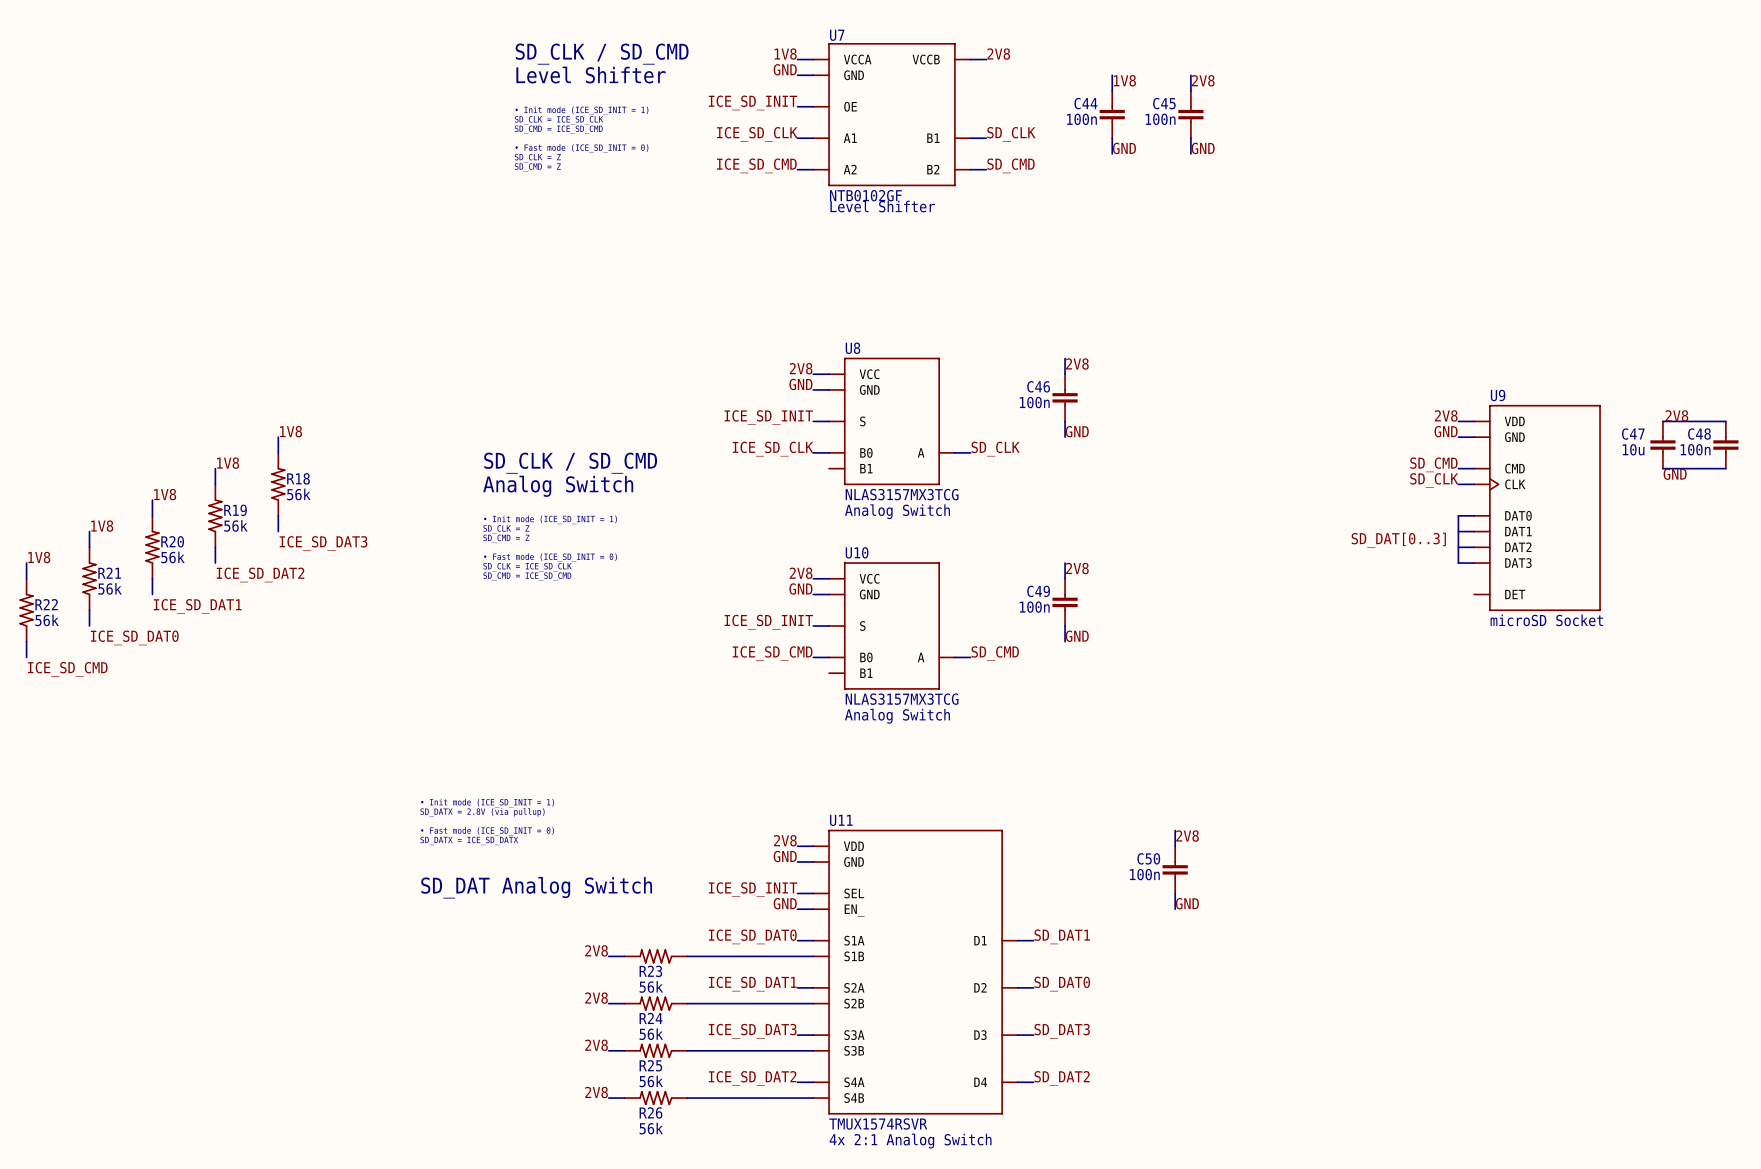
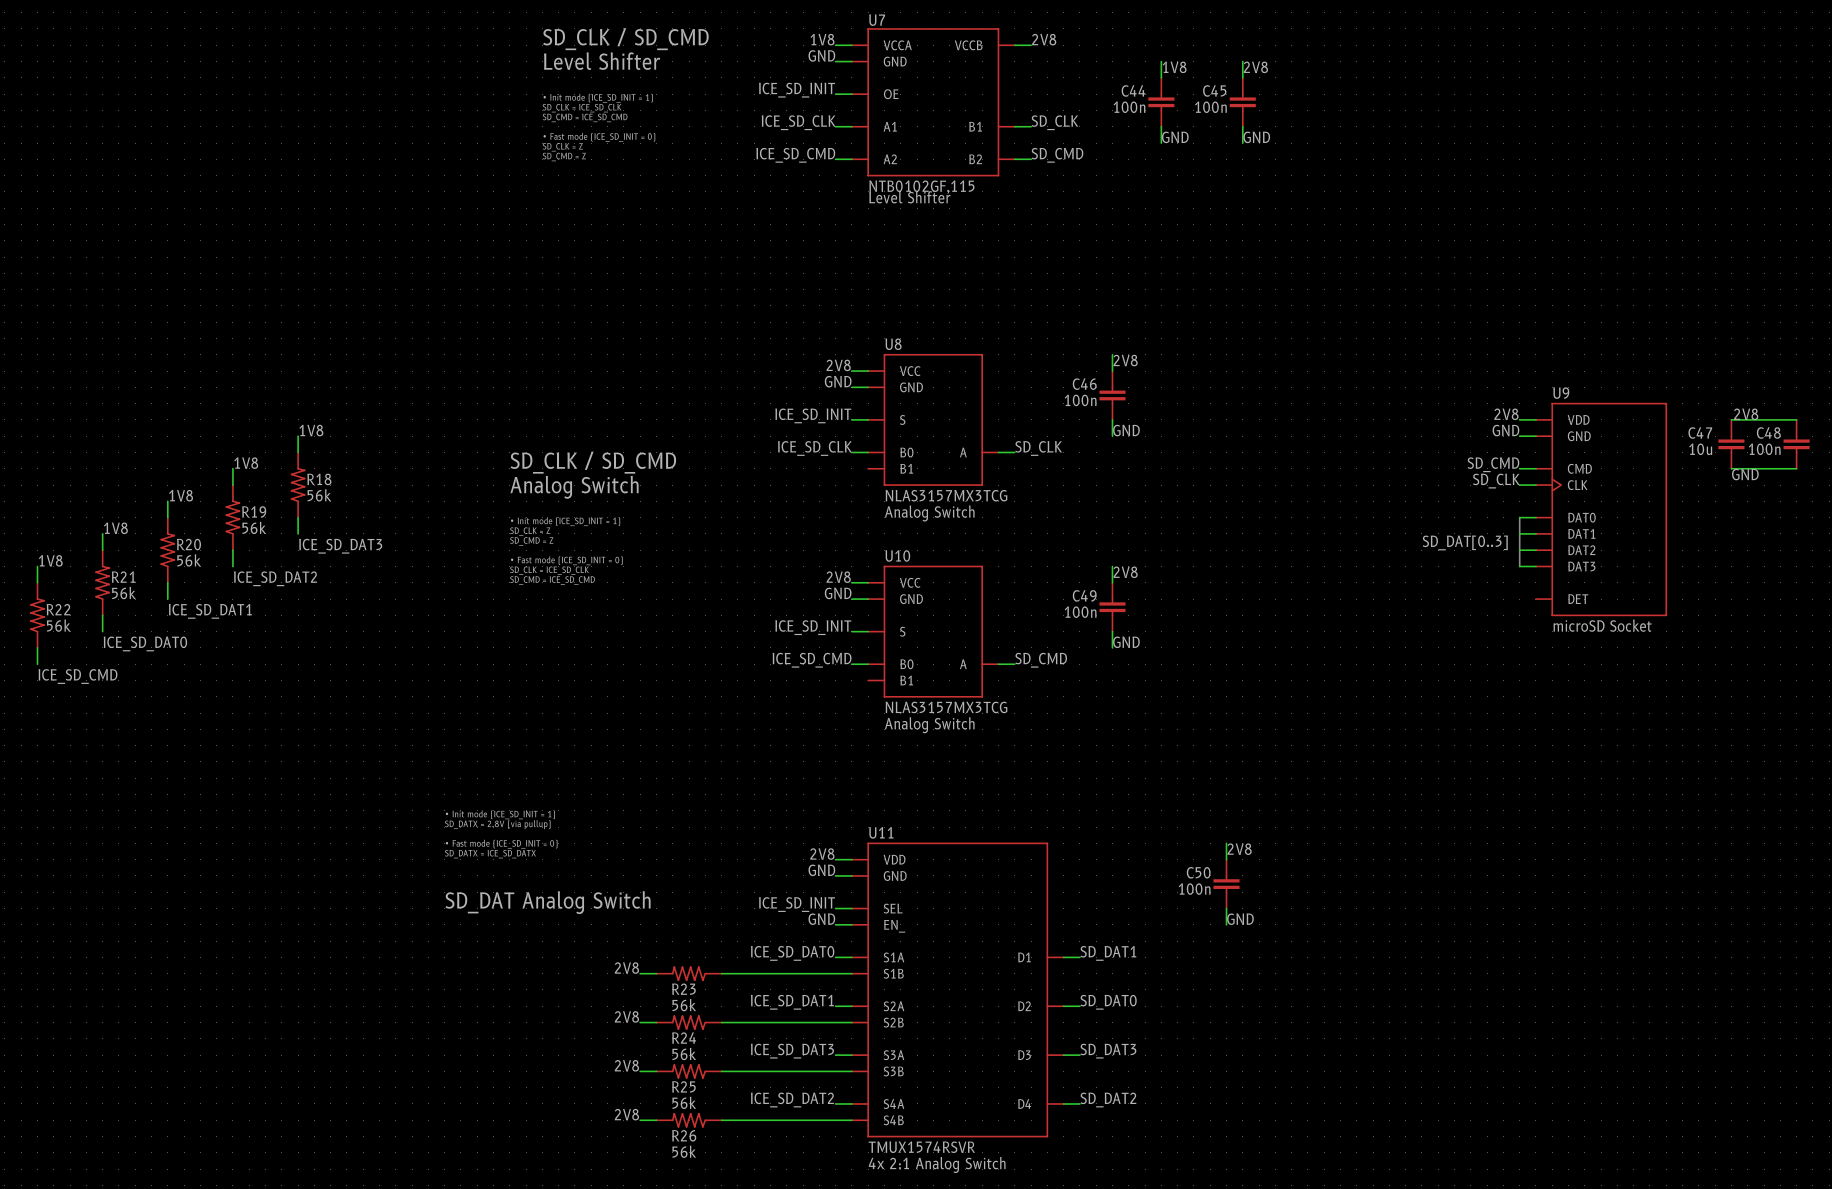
U7 text: NTB0102GF (865, 195) -> NTB0102GF,115 (921, 187)

